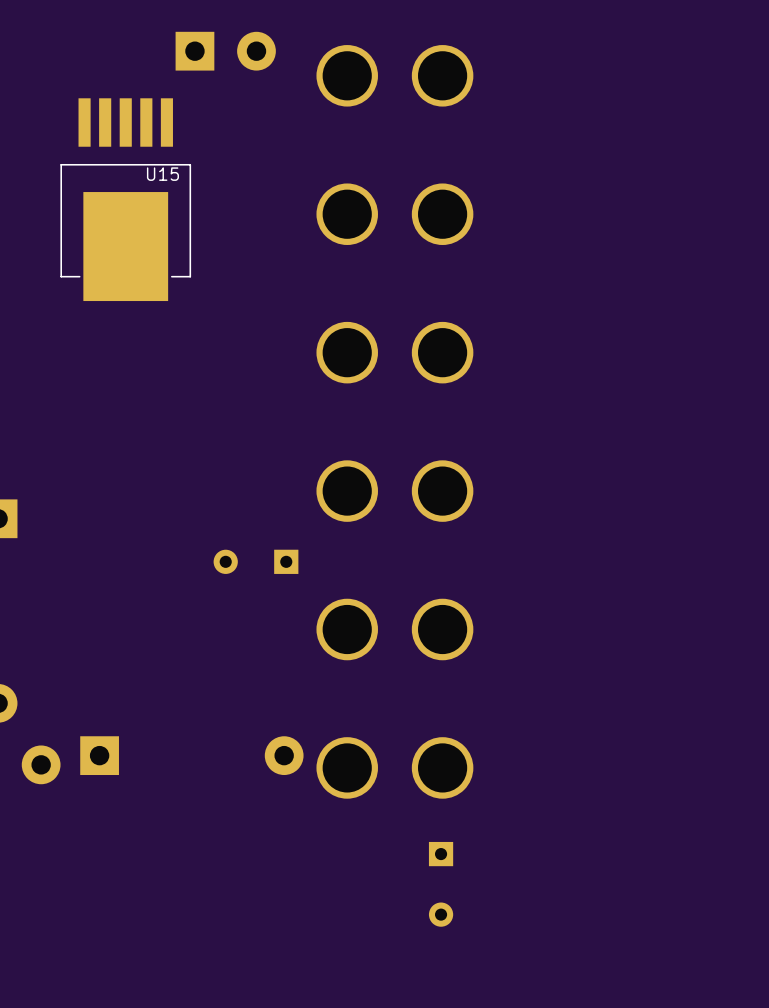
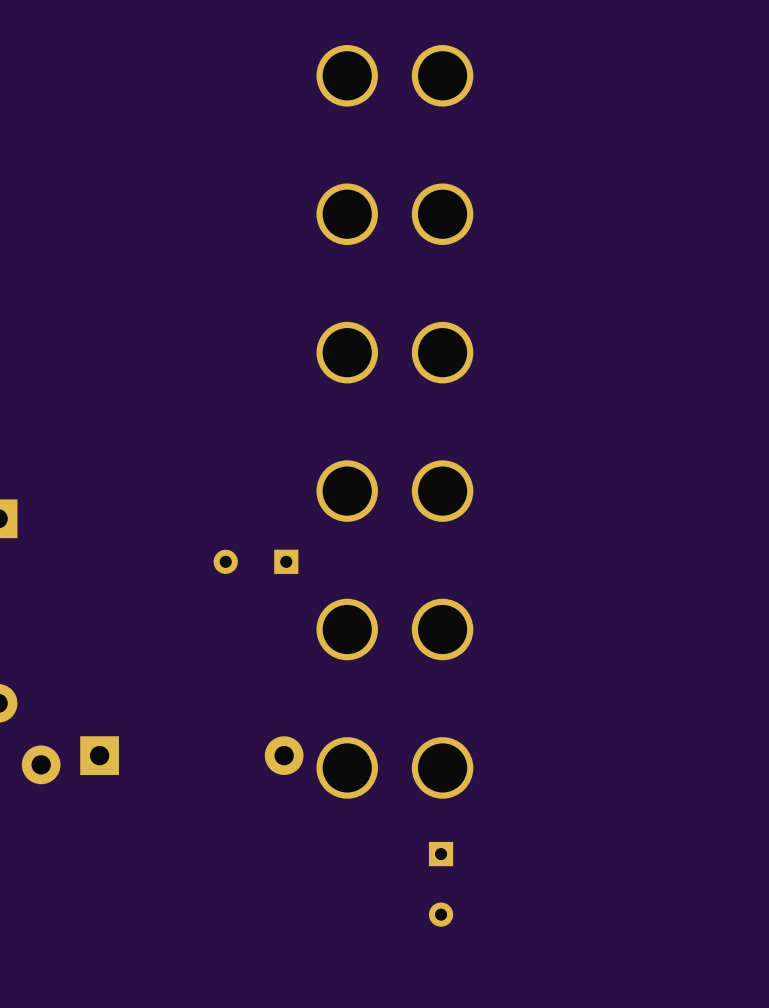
part: (225, 51) -> none
U15: (125, 199) -> none

